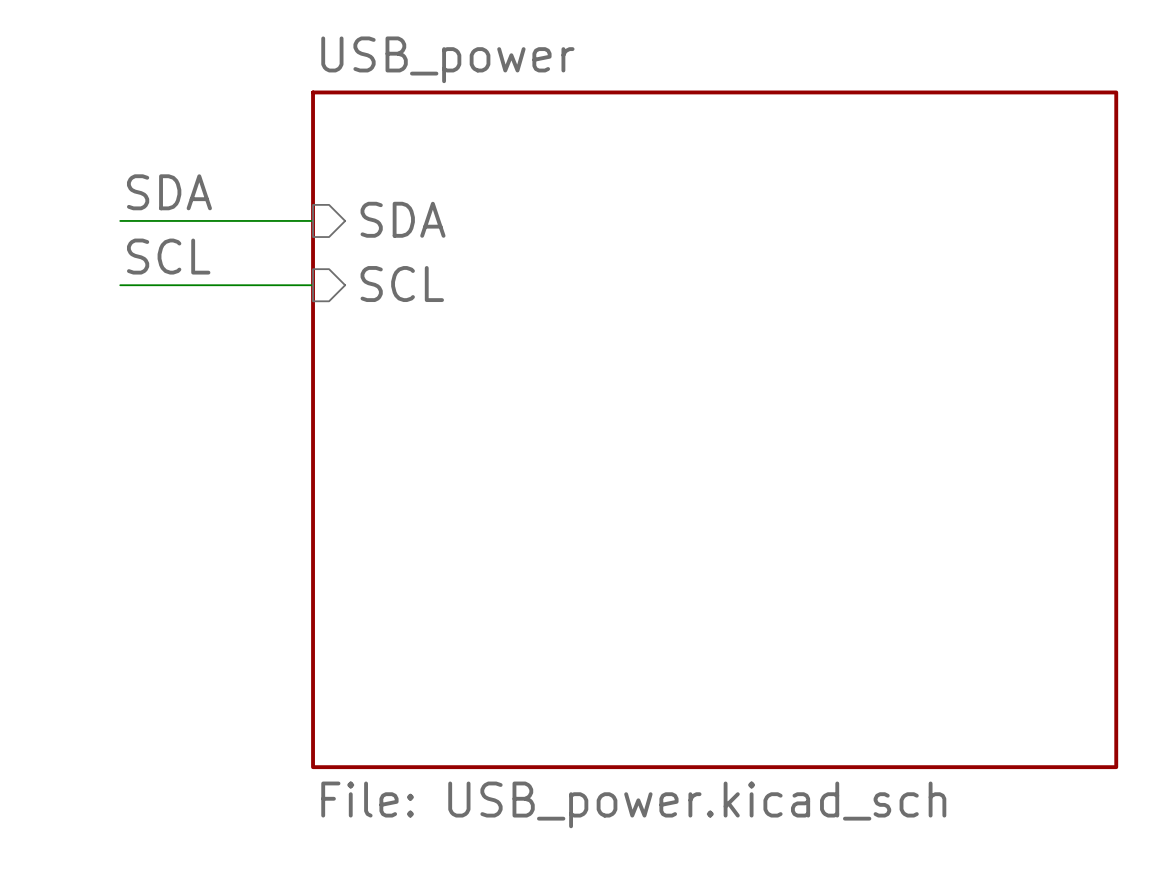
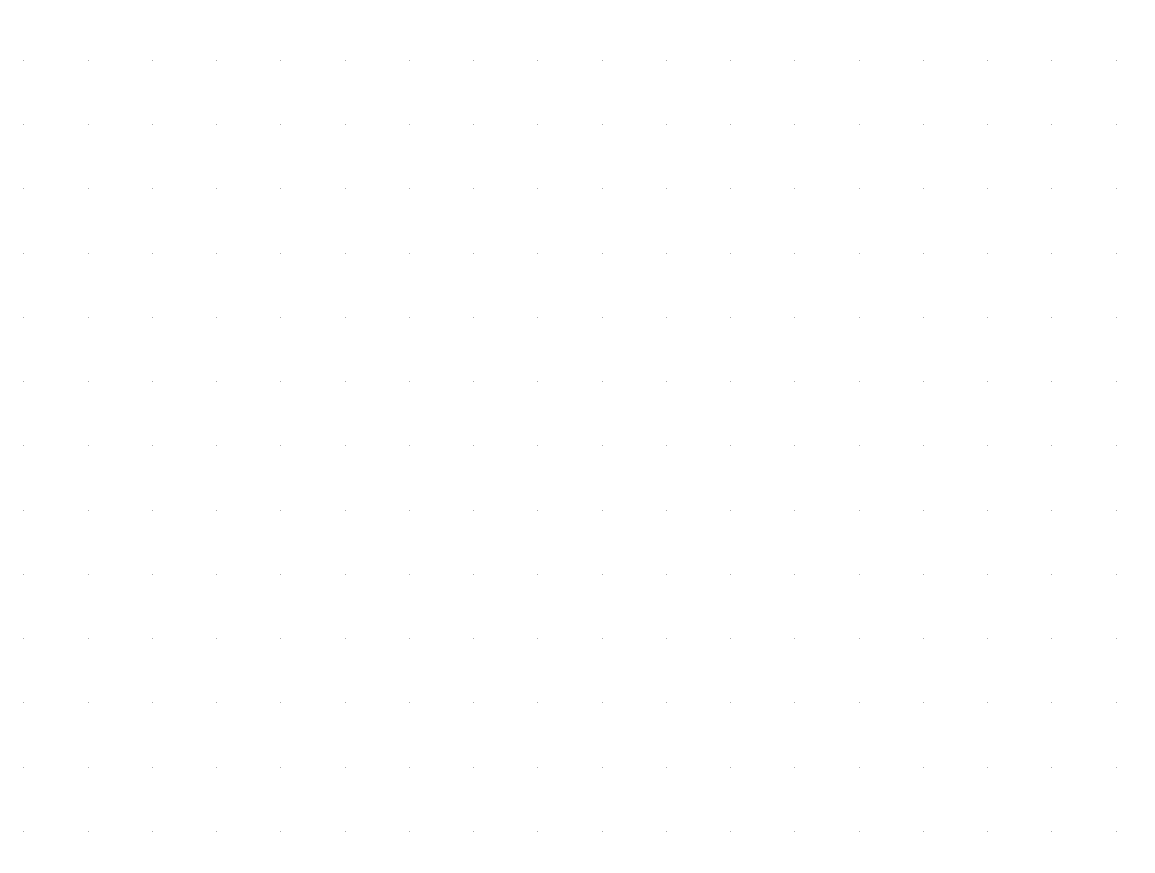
label: SDA (169, 192) -> none
sheet pin: SDA (403, 219) -> none
wire: (120, 220) (313, 220) -> none
label: SCL (168, 256) -> none
sheet pin: SCL (402, 284) -> none
wire: (120, 285) (313, 285) -> none
sheet USB_power: File: USB_power.kicad_sch (714, 429) -> none

